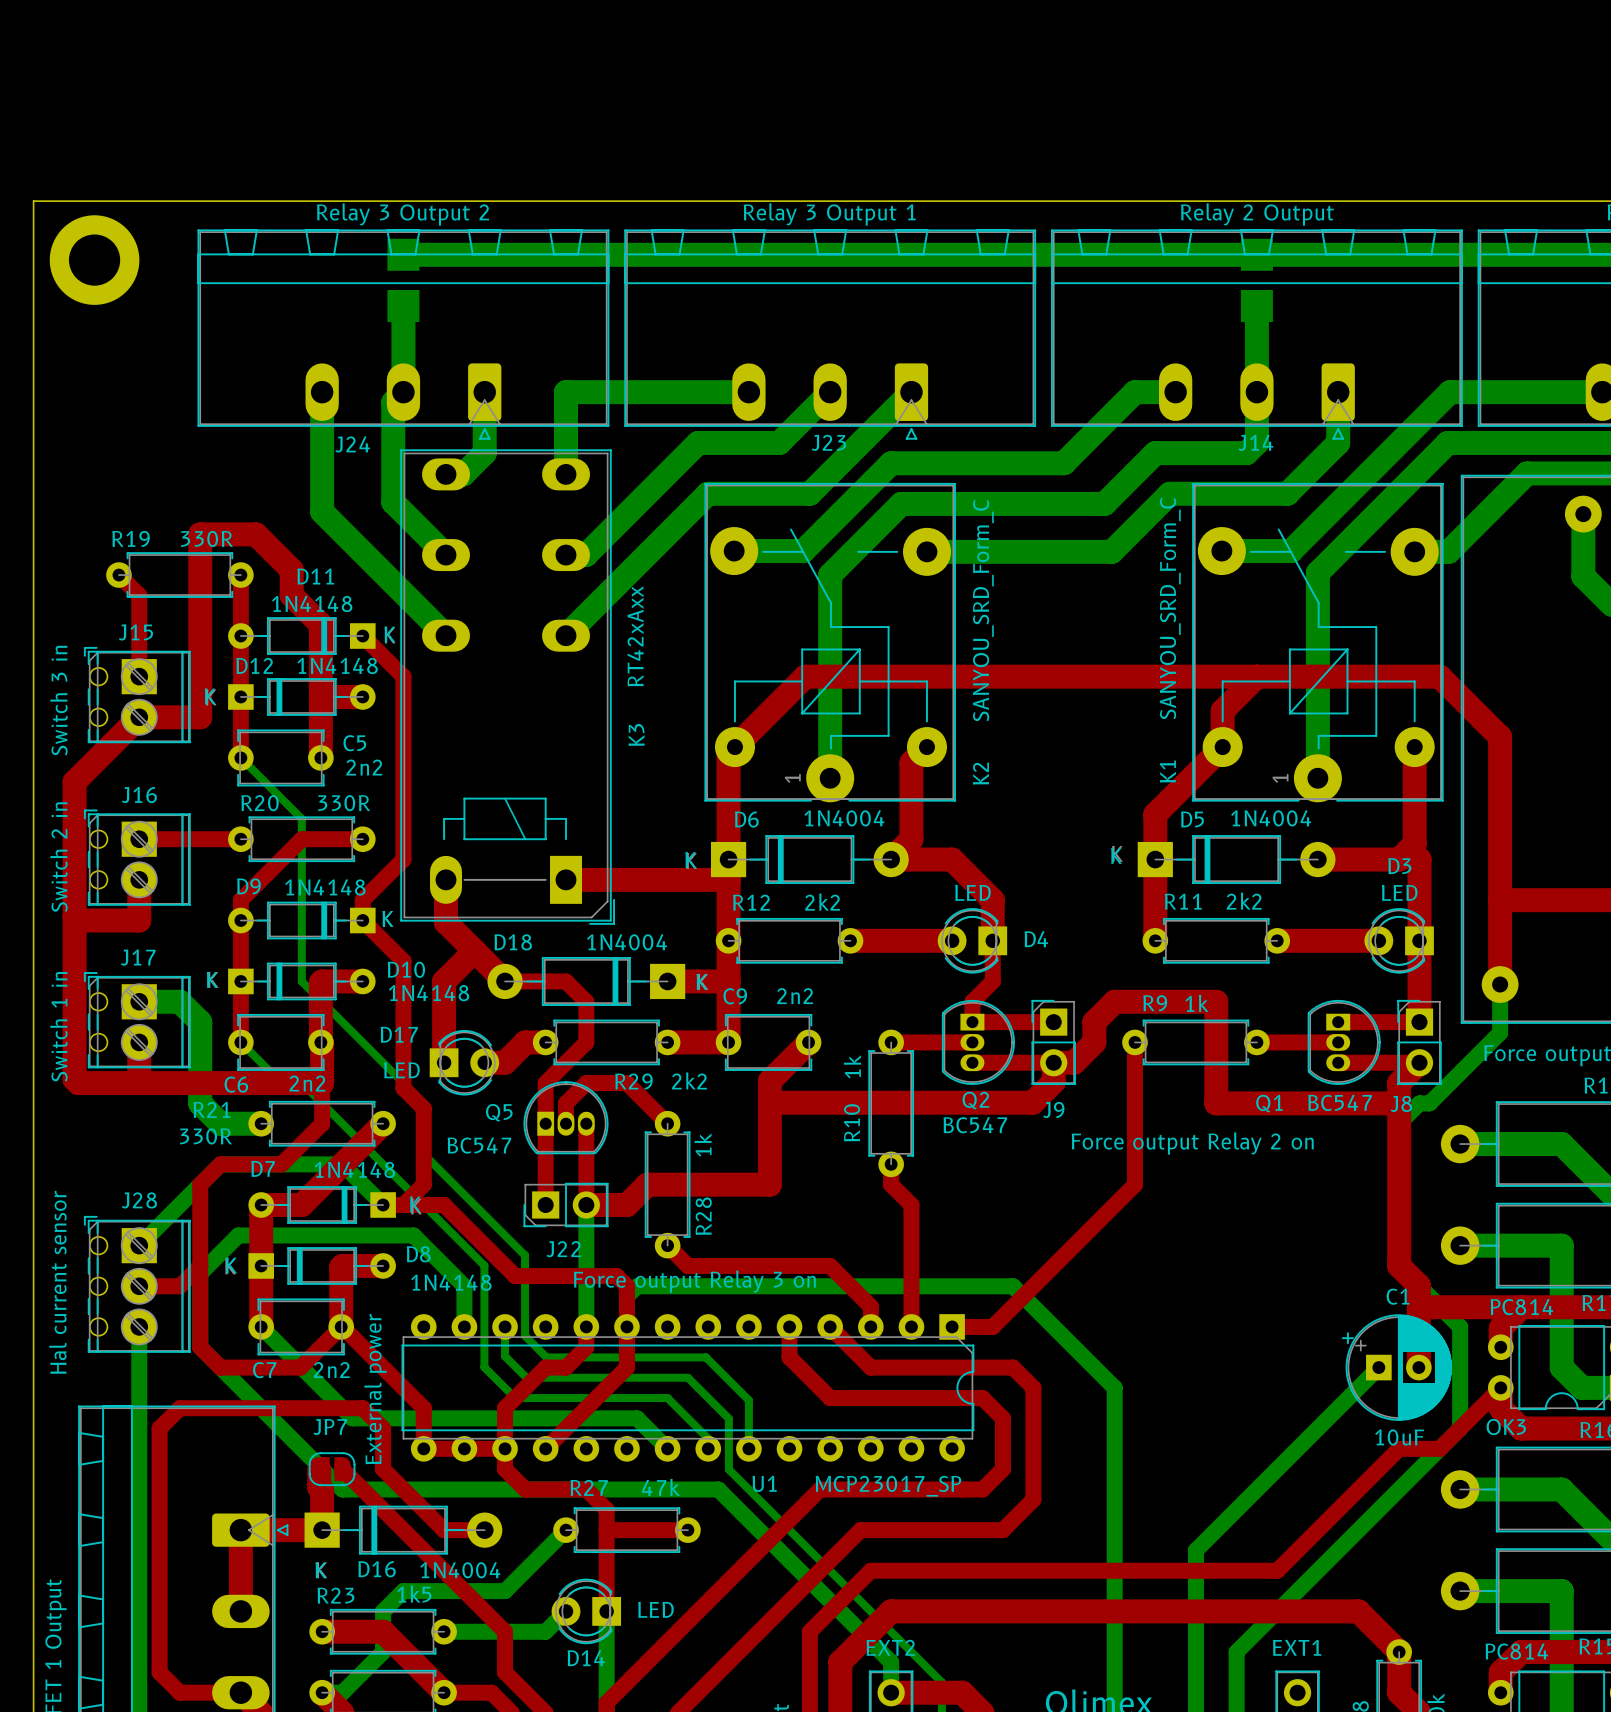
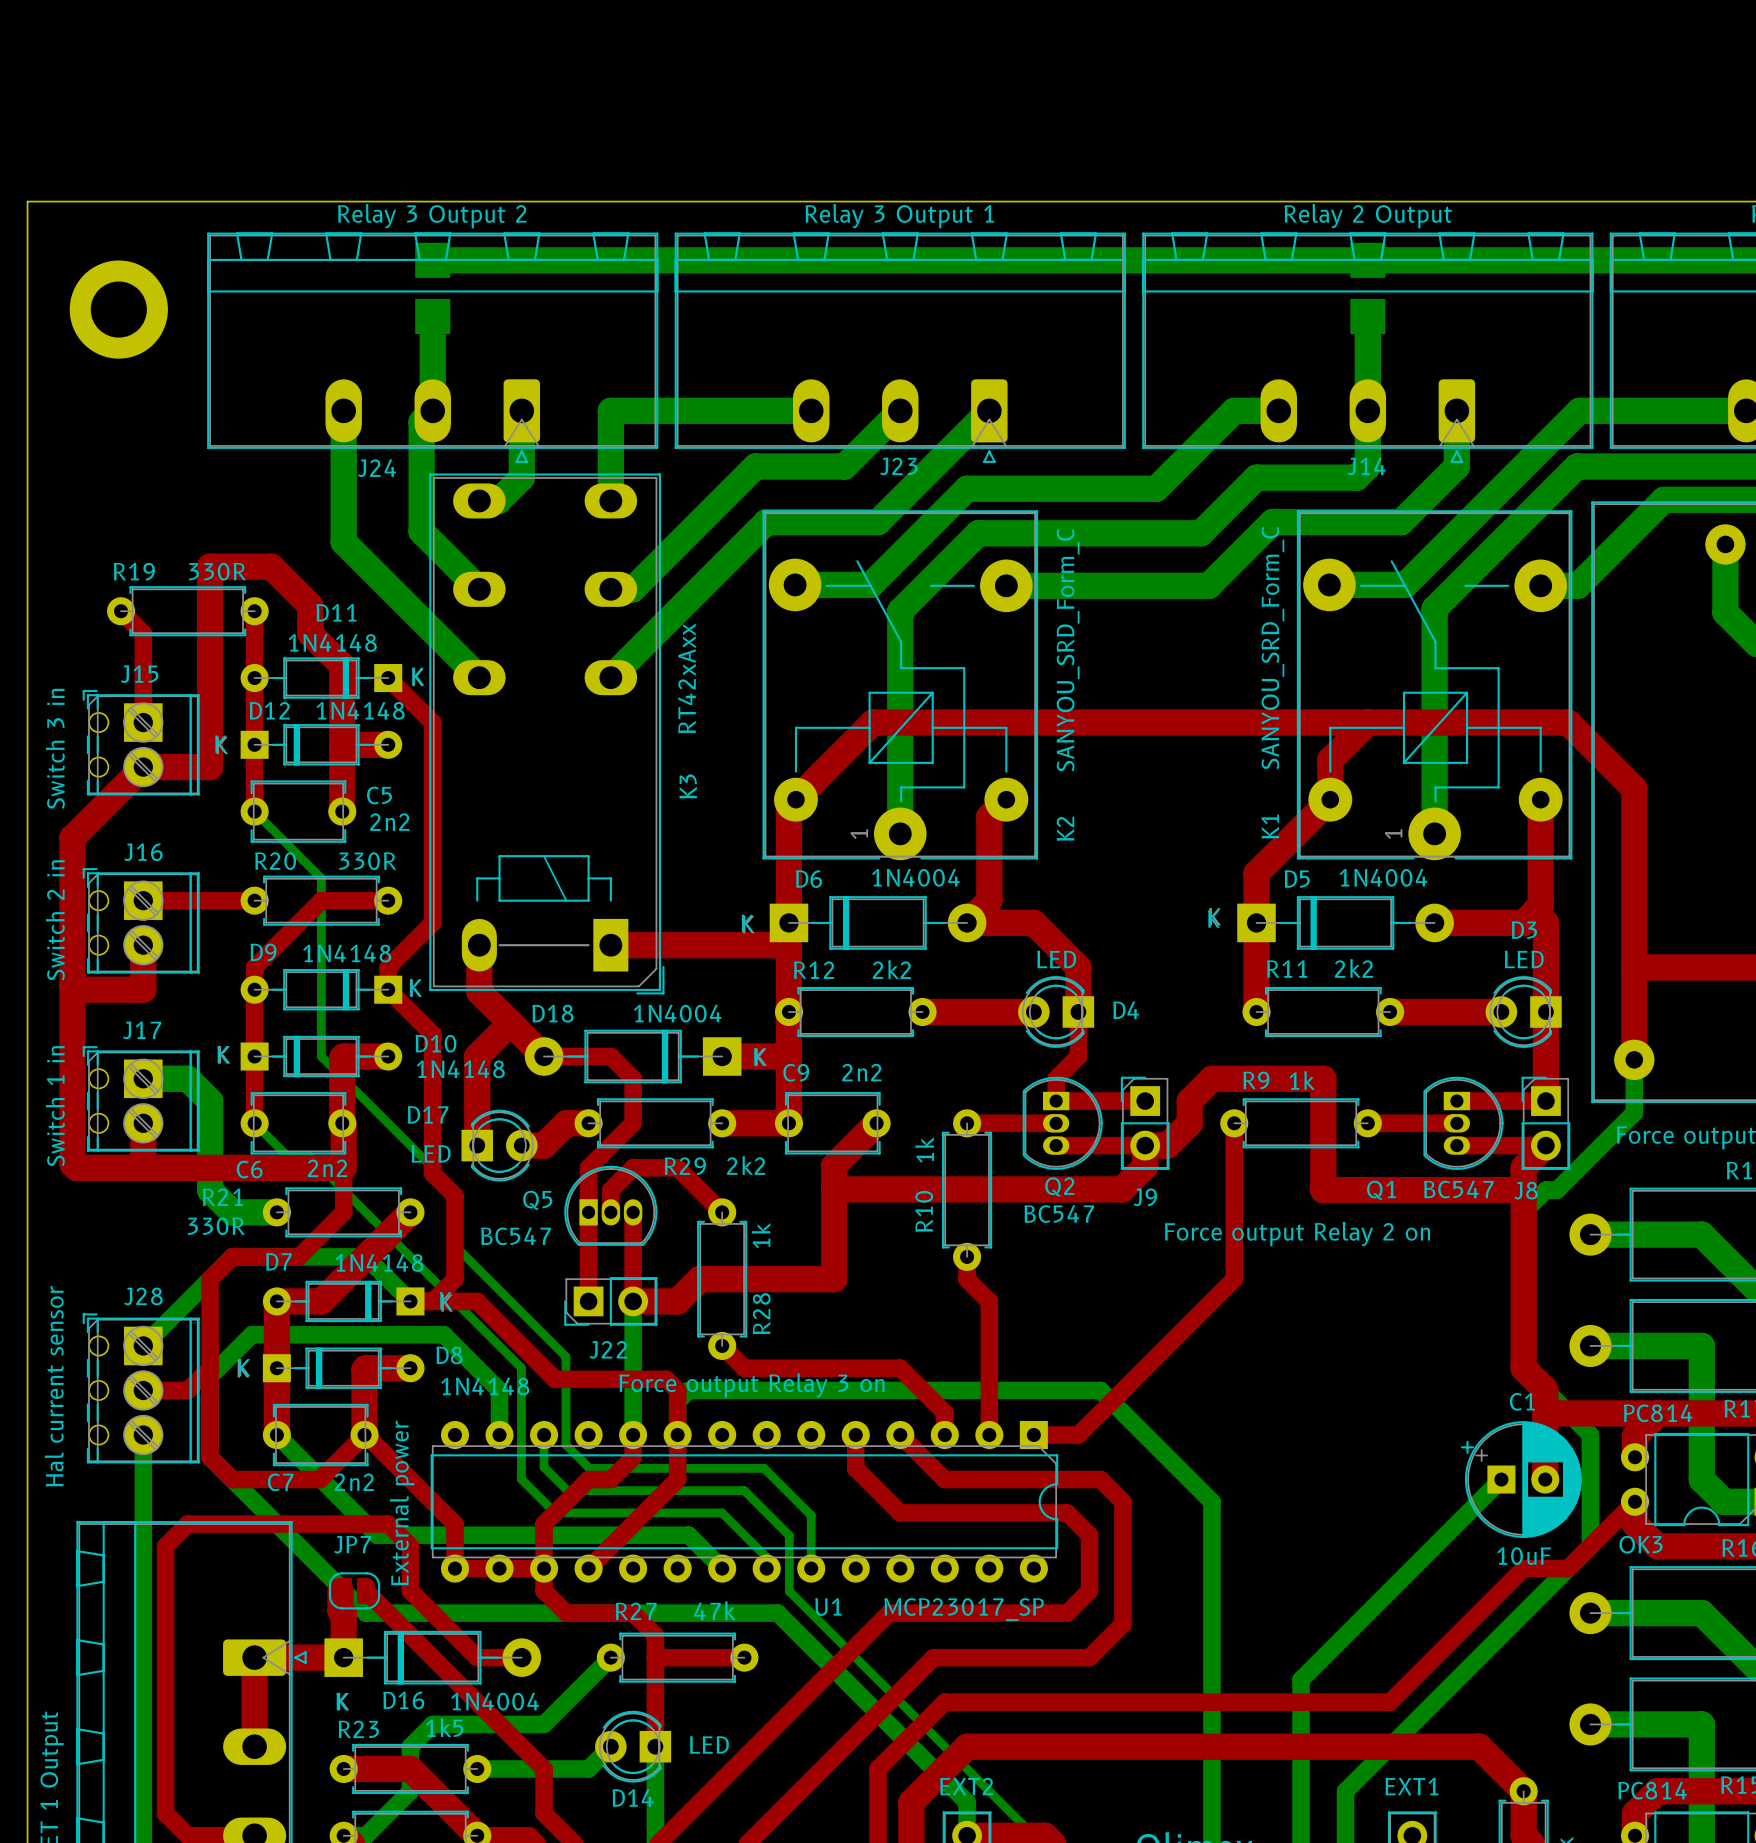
part position: (94, 260) -> (118, 309)

